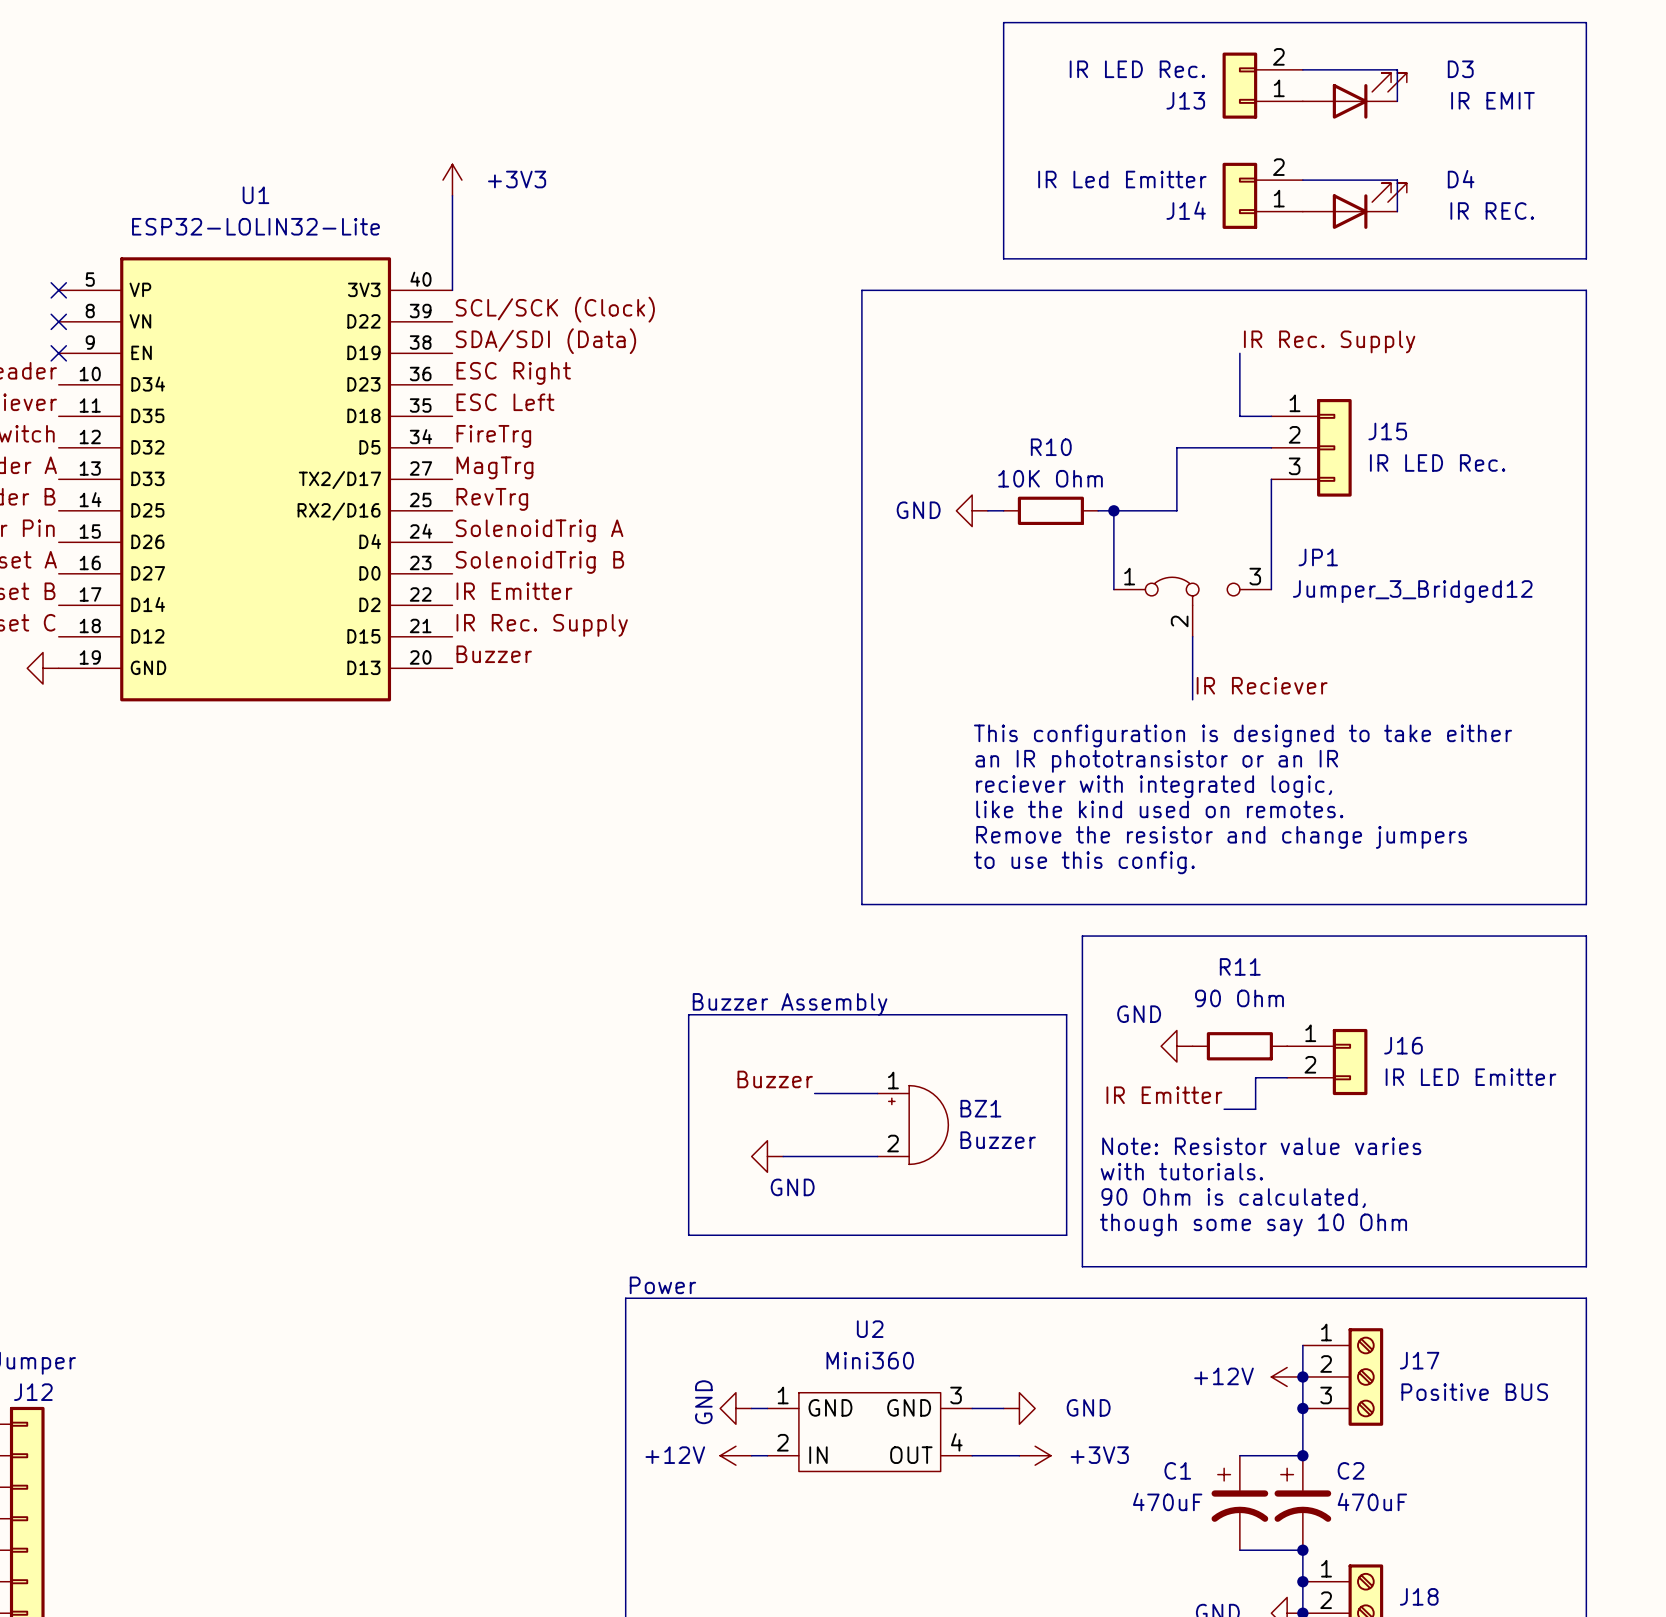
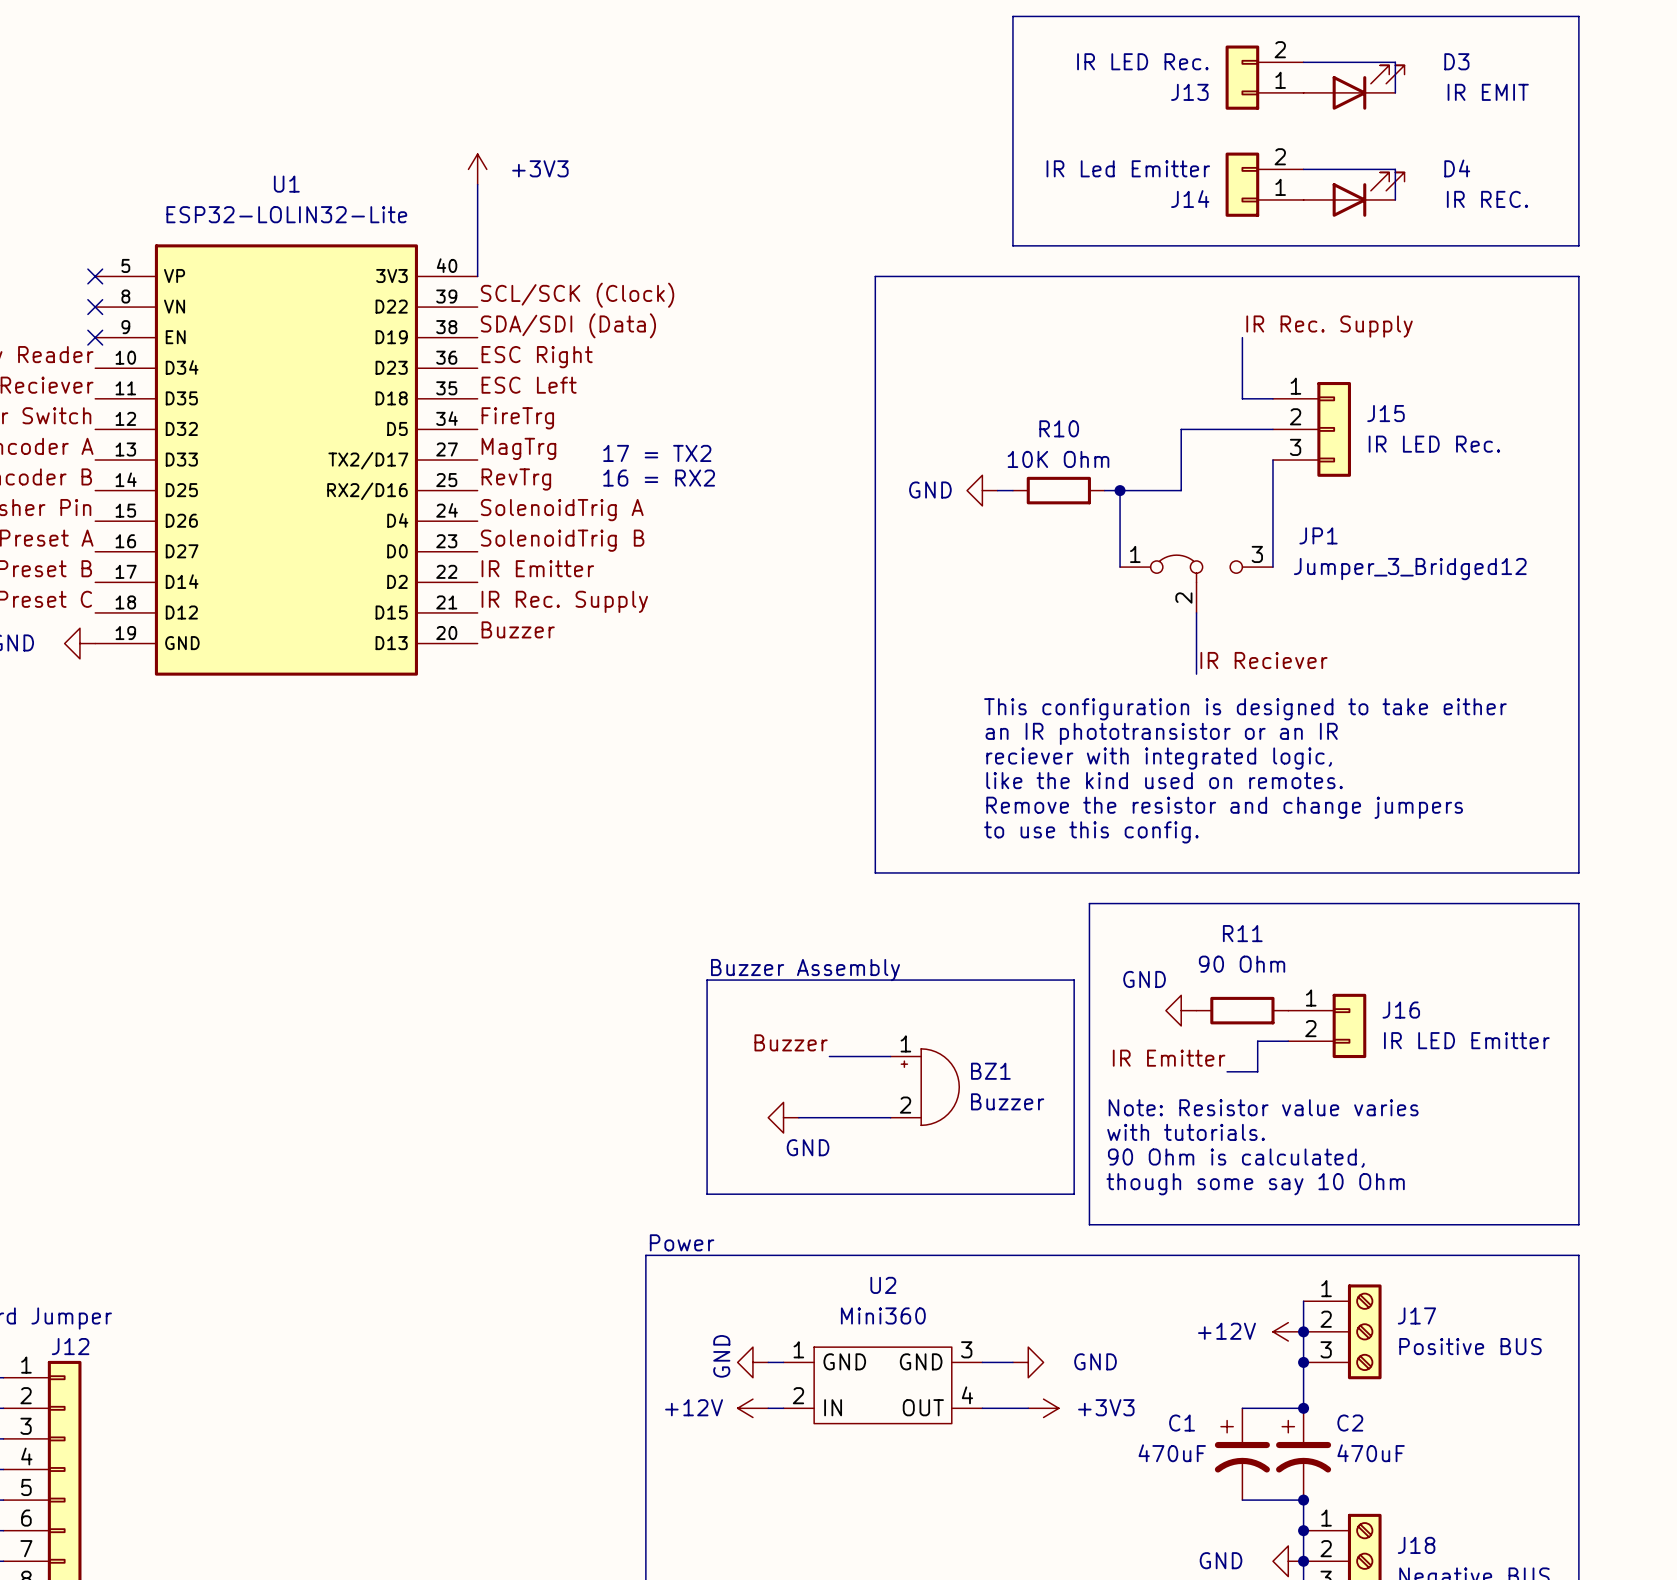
text: none -> 17 = TX2 (657, 453)
text: none -> 16 = RX2 (659, 478)

